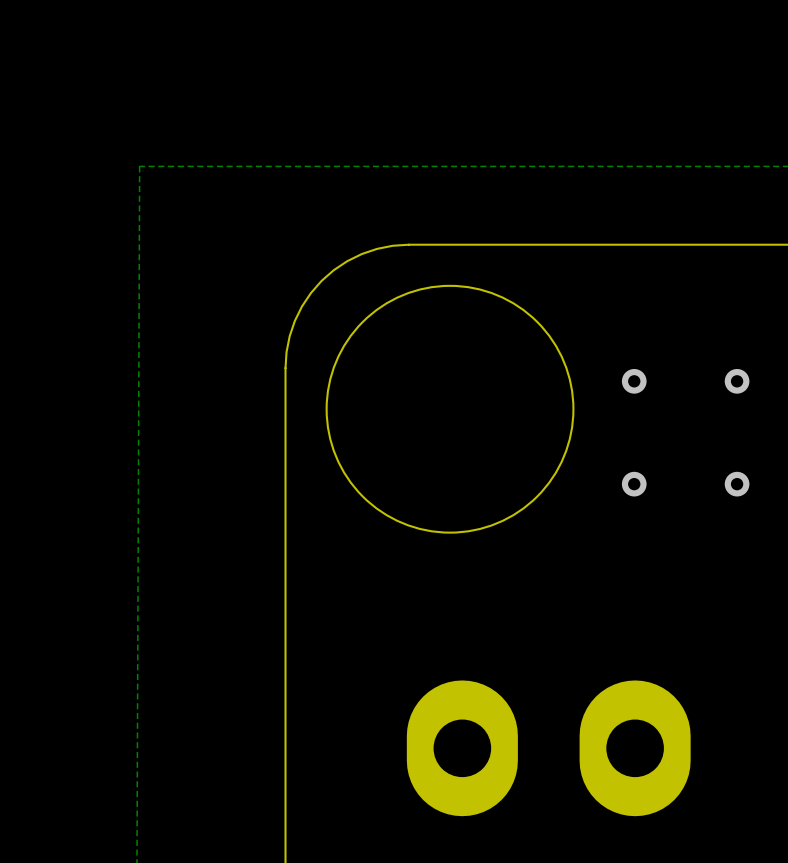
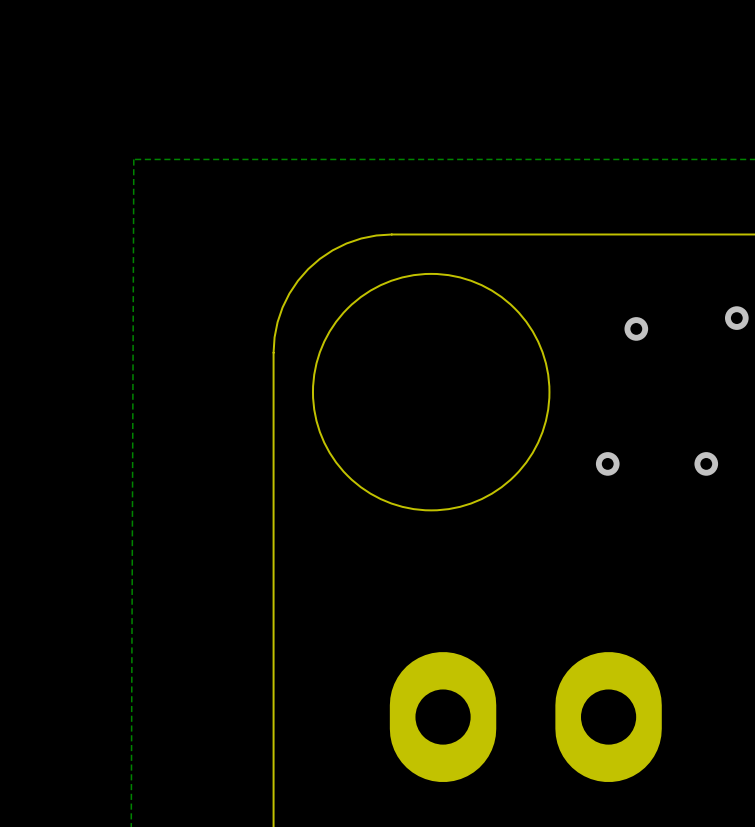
via: none -> (736, 318)
via: none -> (636, 328)
via: (634, 381) -> none
via: (737, 381) -> none

